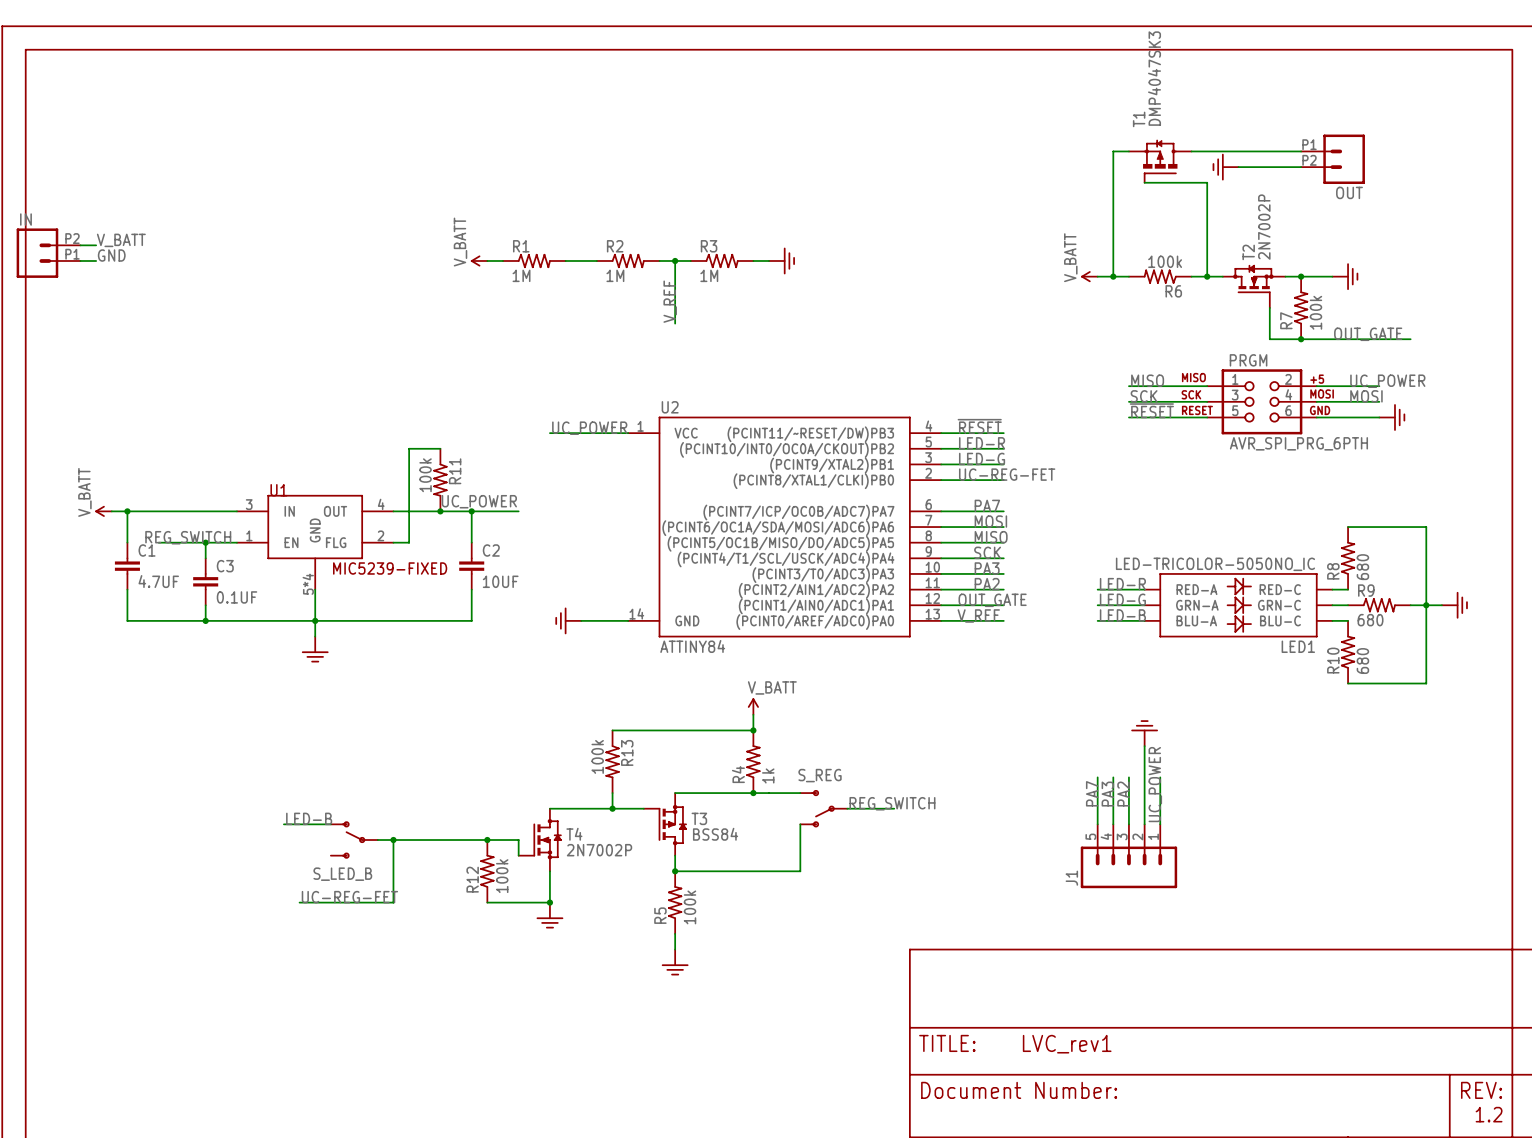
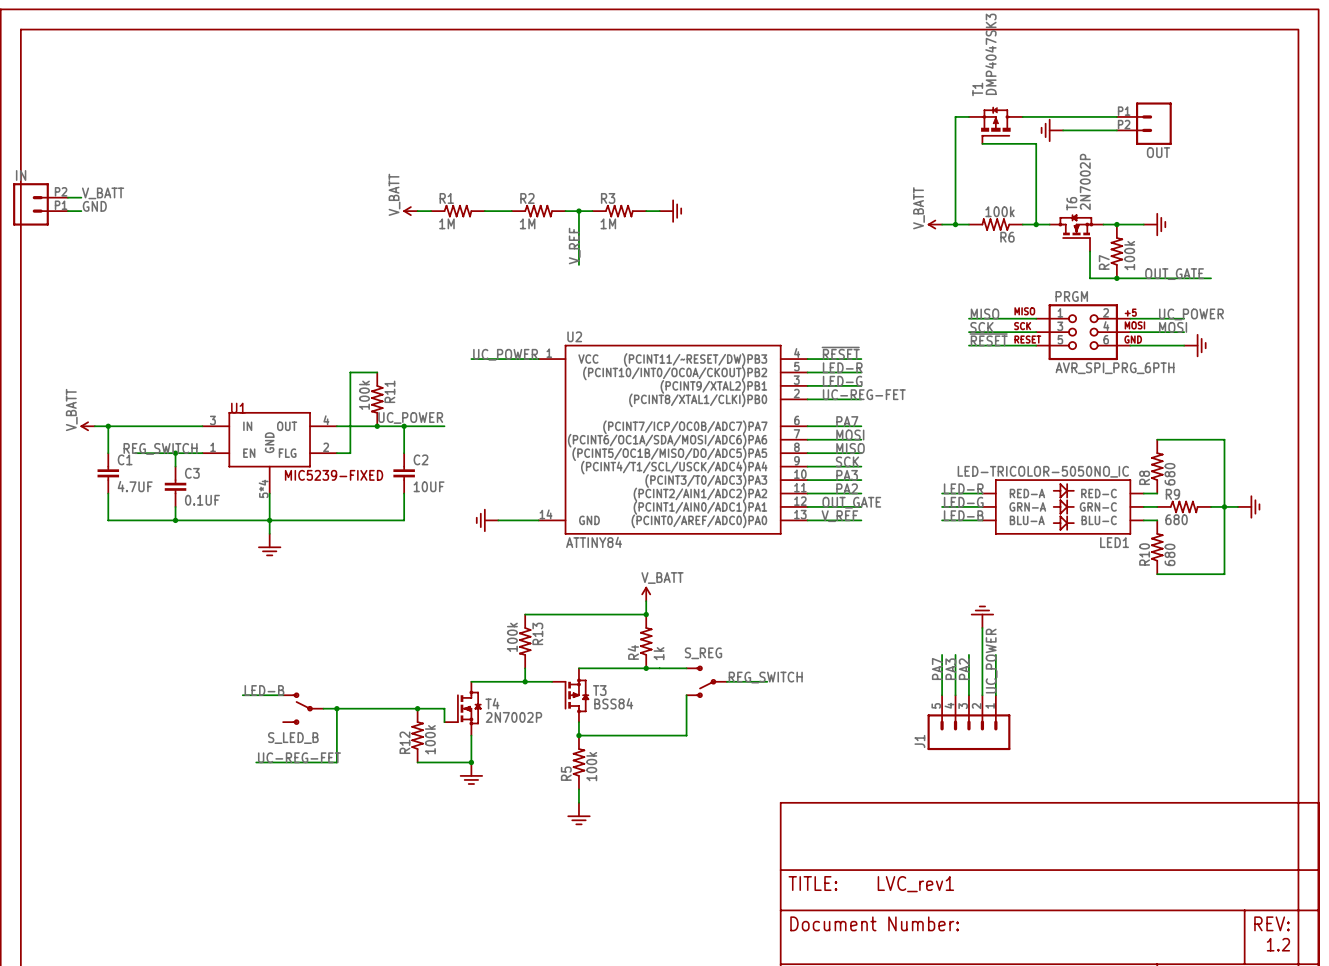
T2 name: T2 (1248, 252) -> T6 (1071, 203)

